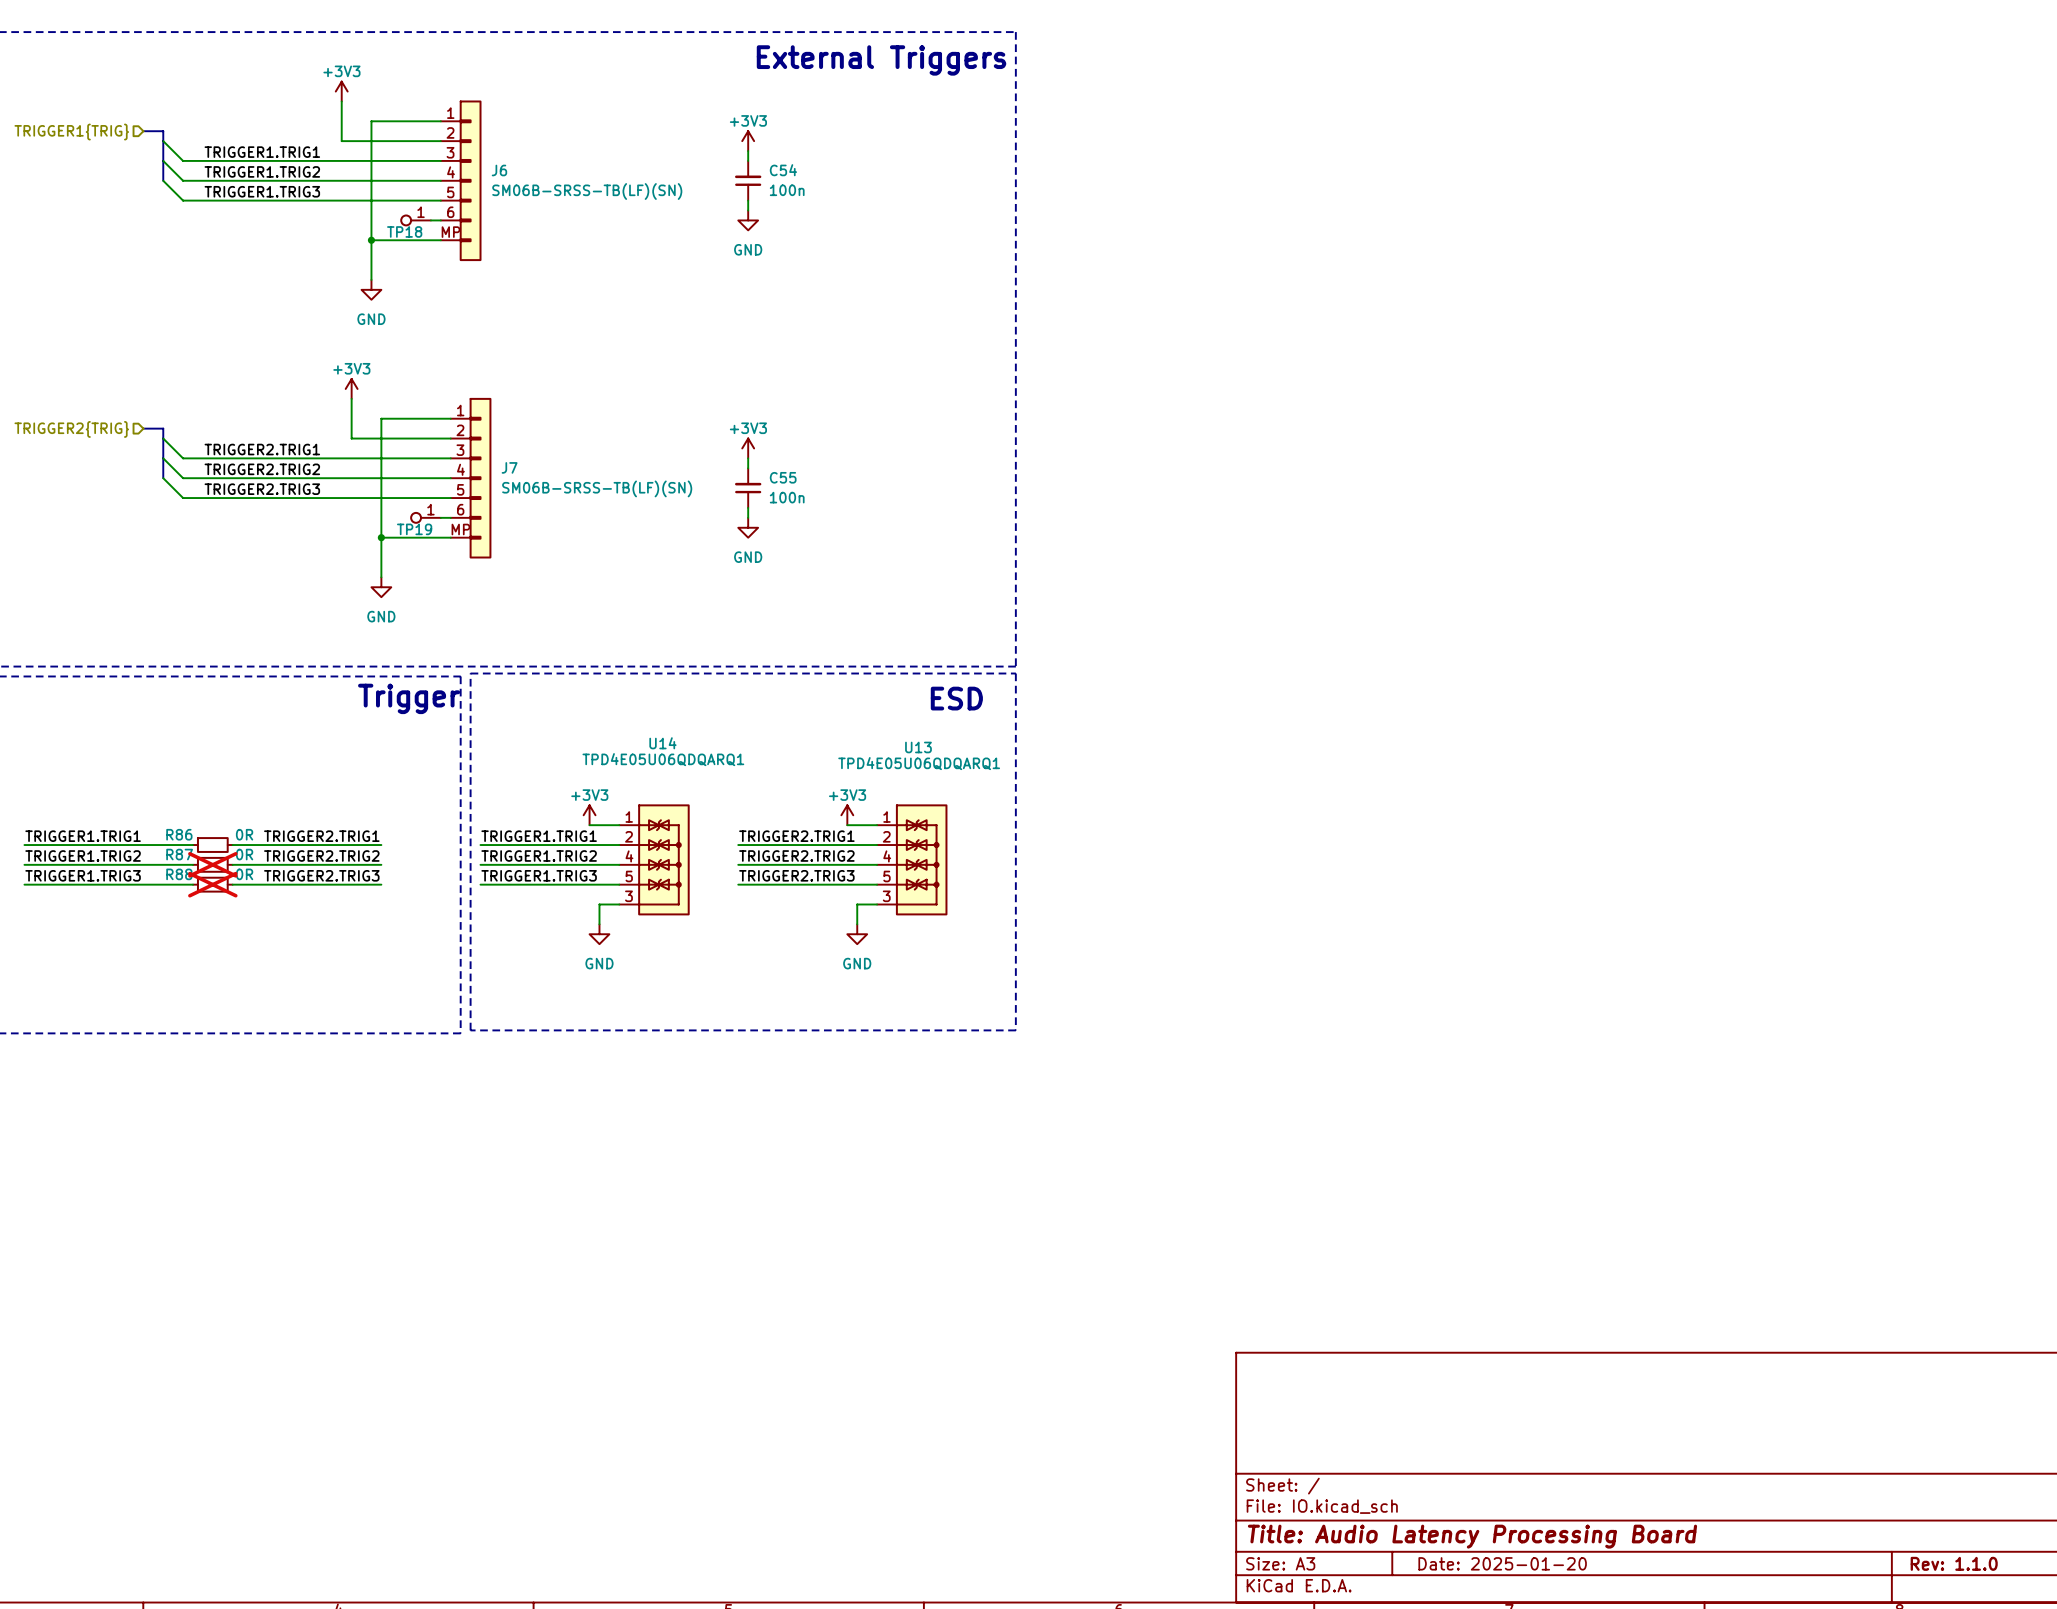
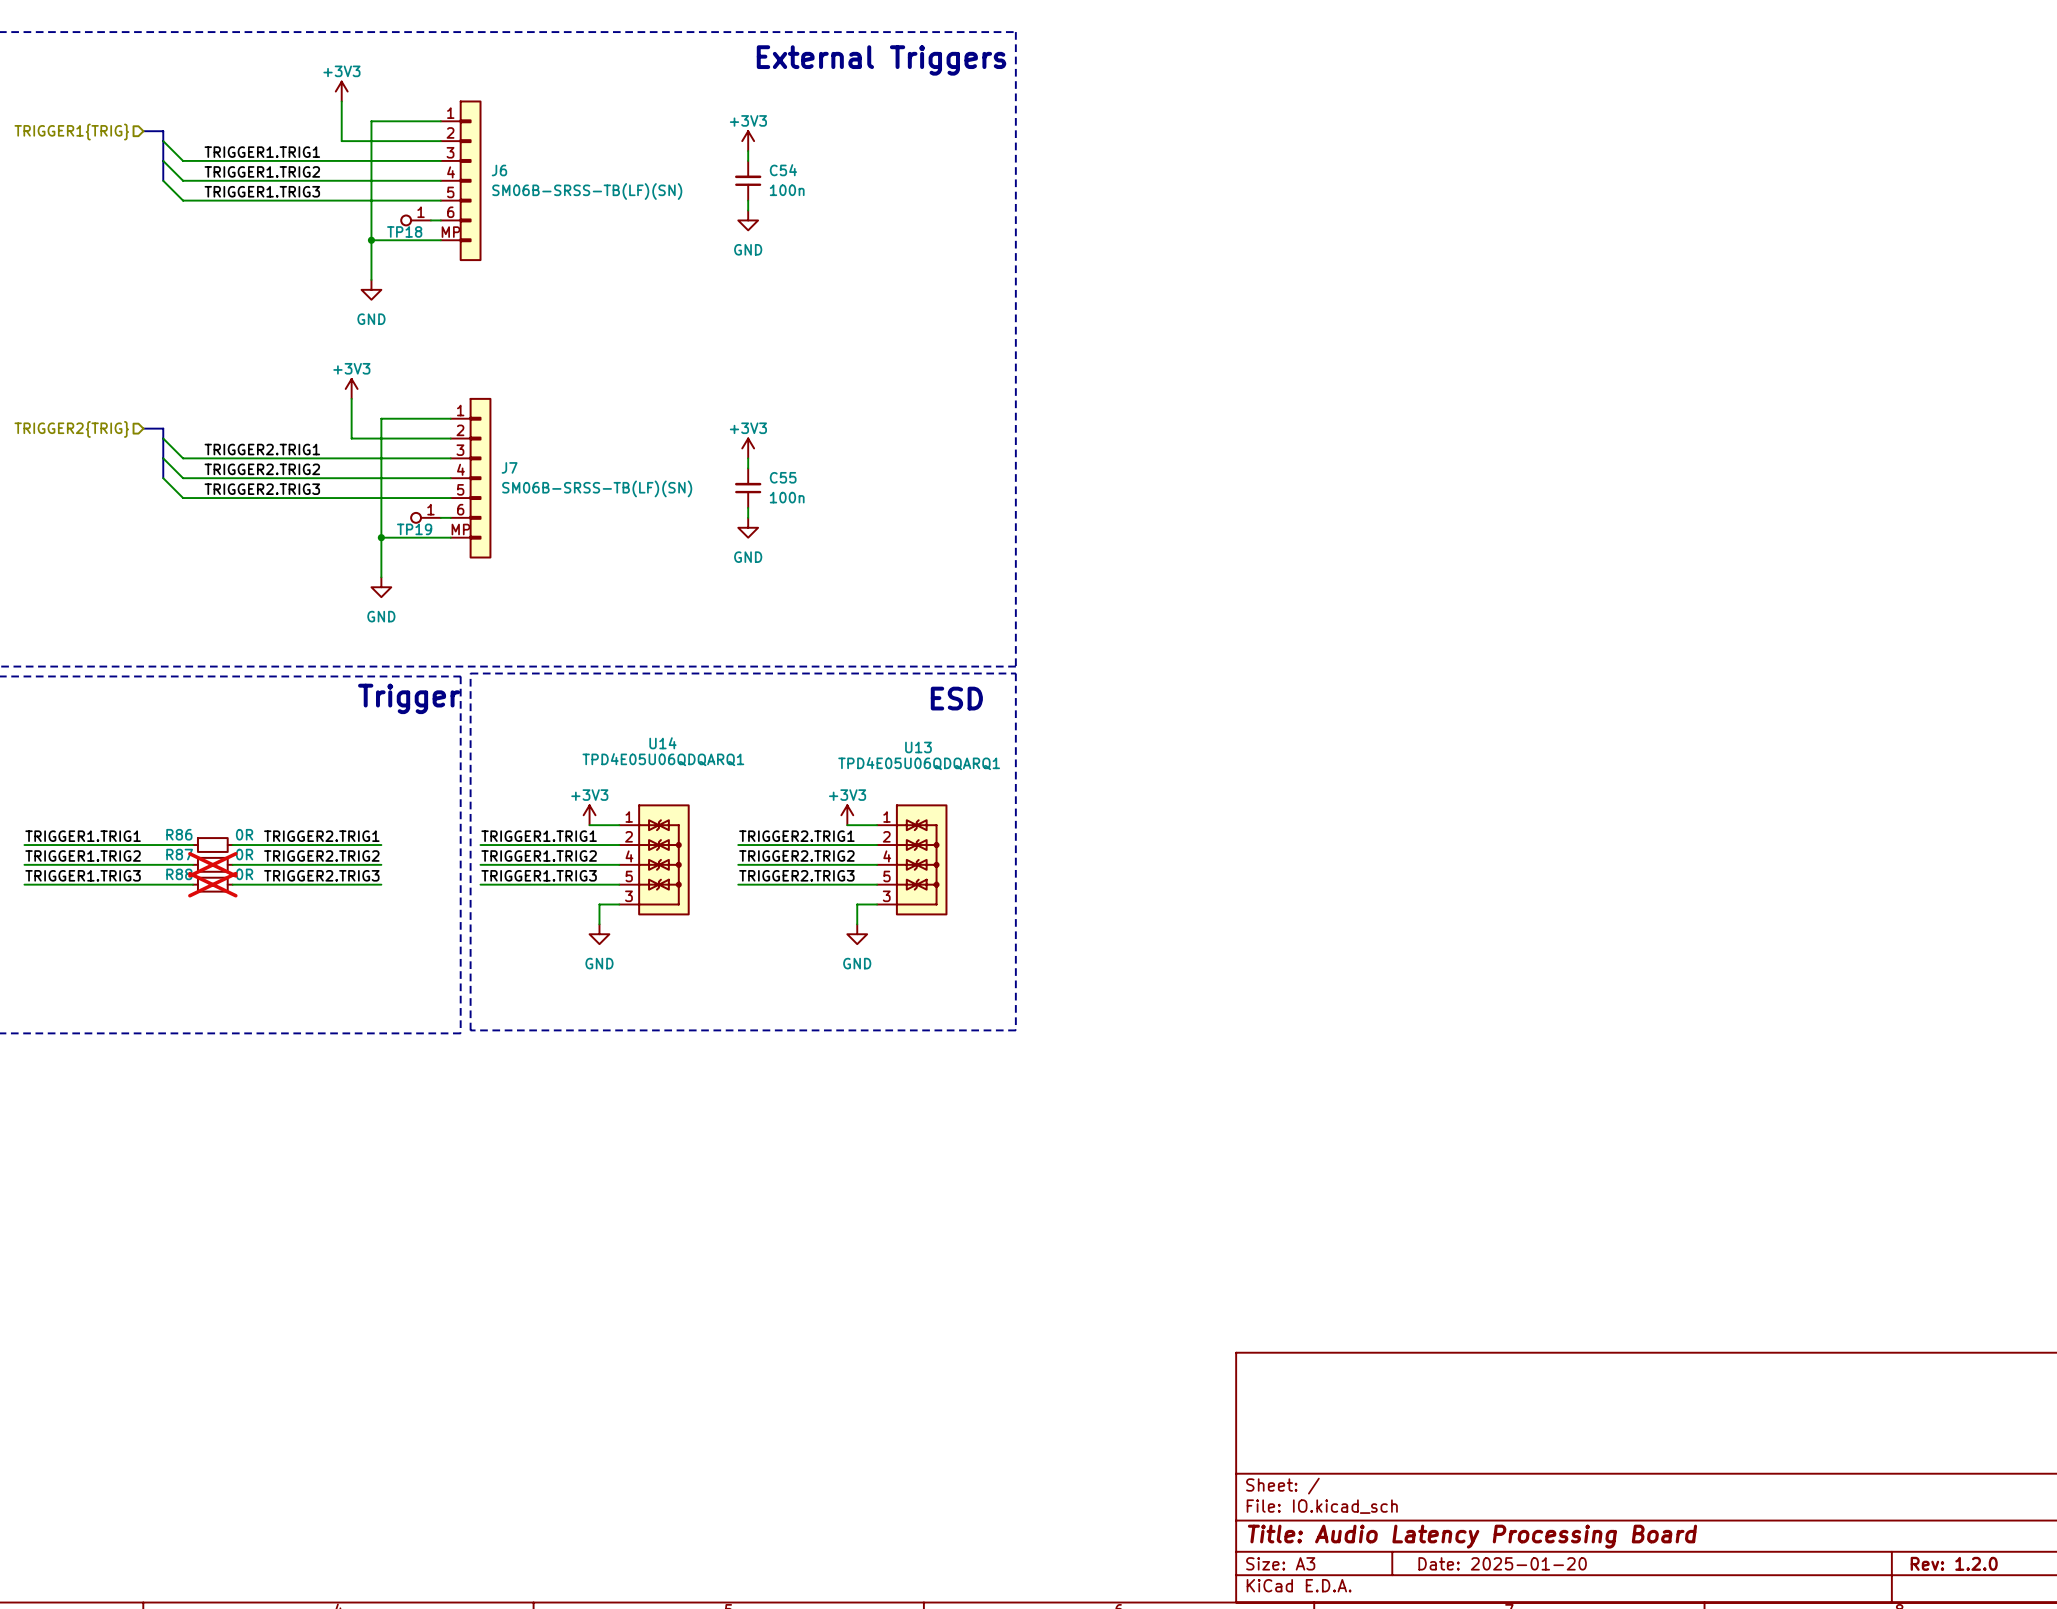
title block: Rev: 1.1.0 (1954, 1563) -> Rev: 1.2.0 (1954, 1563)

